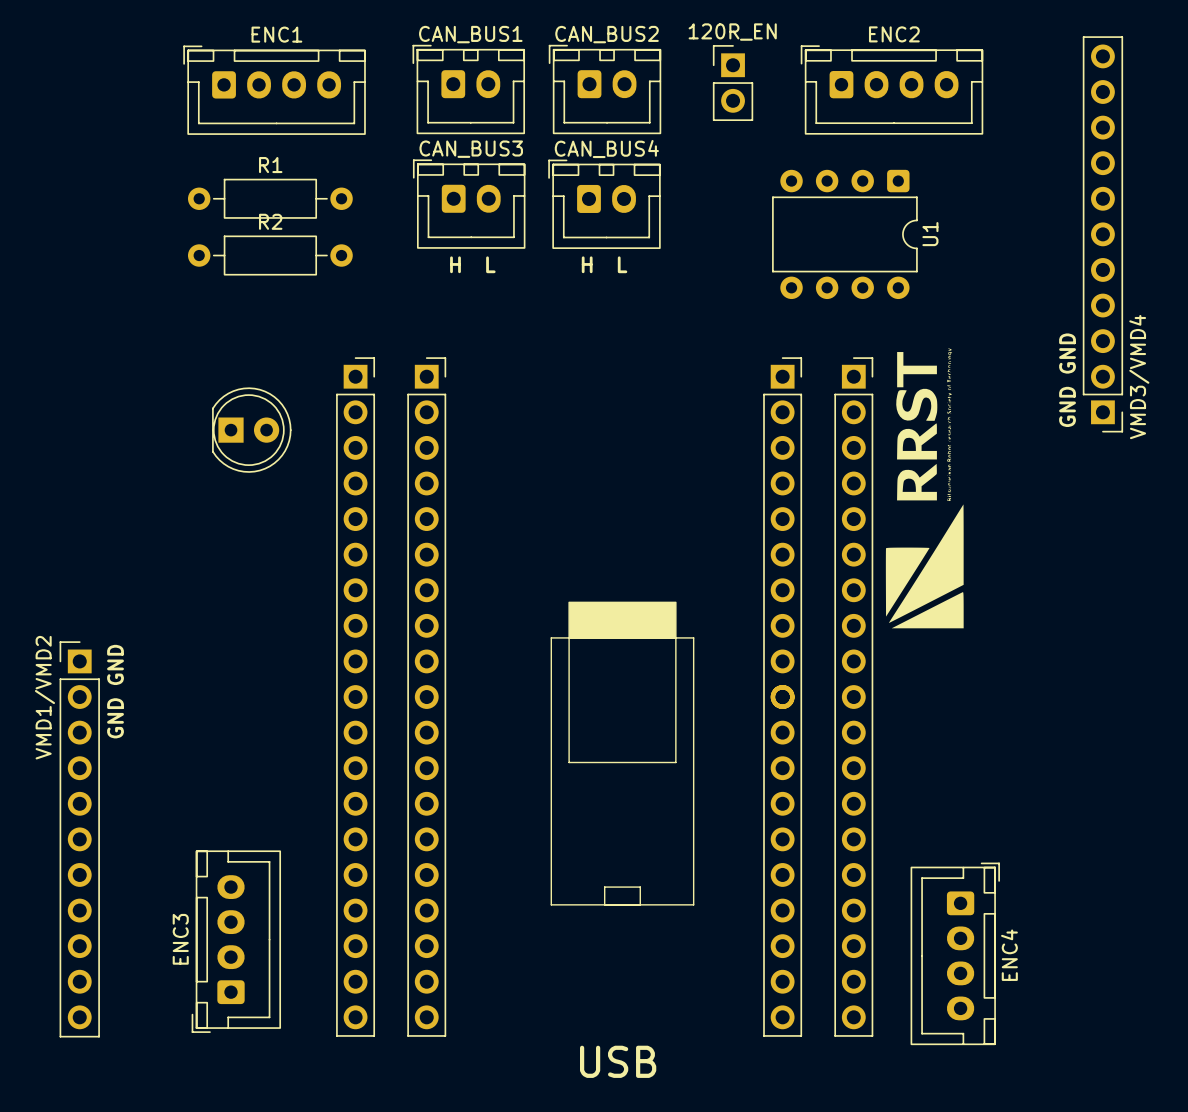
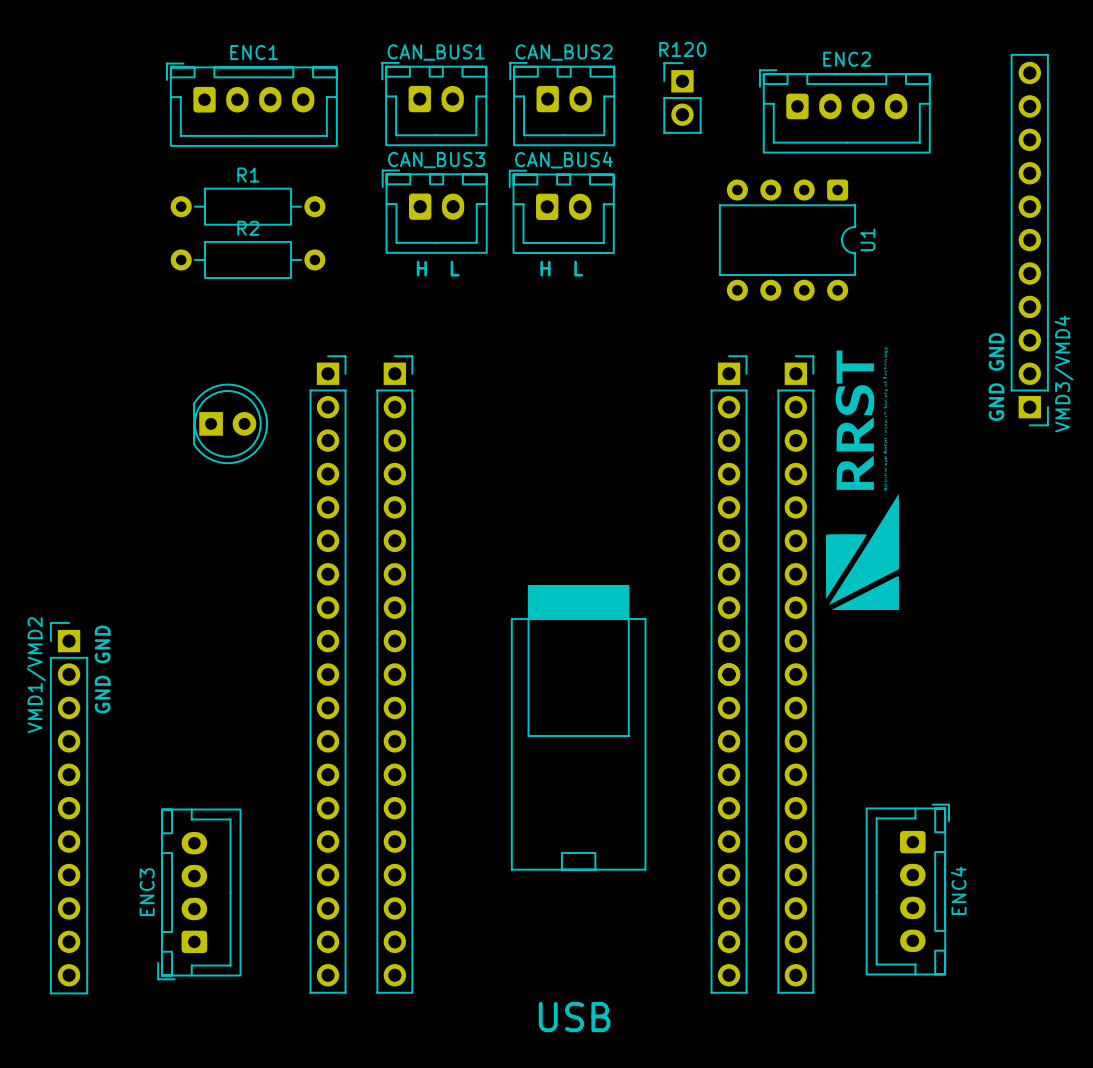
120R_EN name: 120R_EN (732, 32) -> R120 (682, 49)
ENC2 position: (892, 89) -> (844, 111)
ENC3 position: (236, 941) -> (199, 894)
ENC4 position: (955, 953) -> (907, 889)

